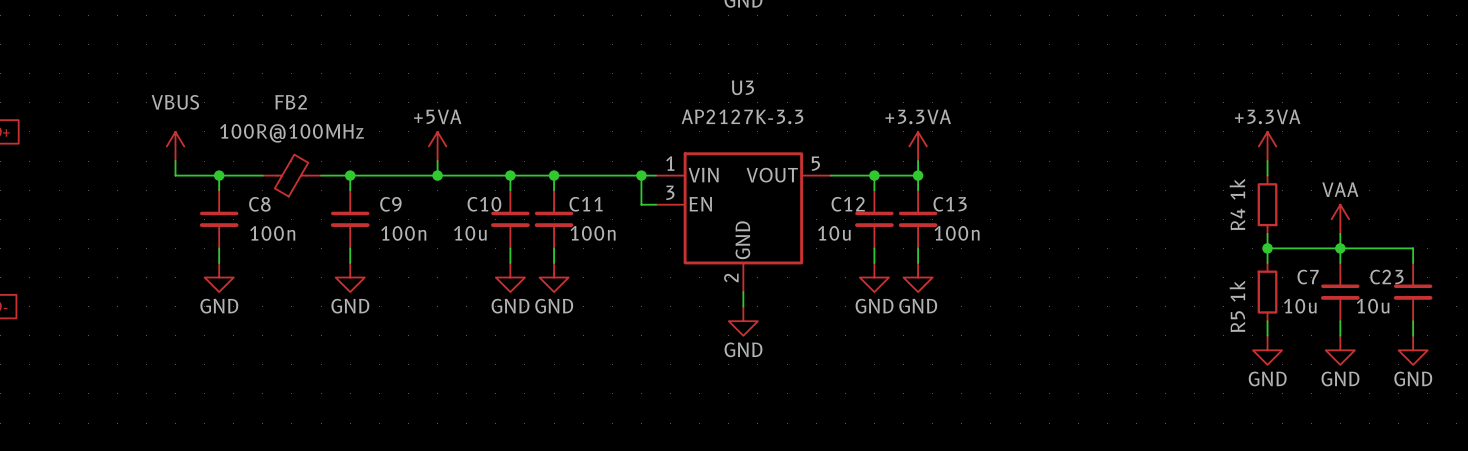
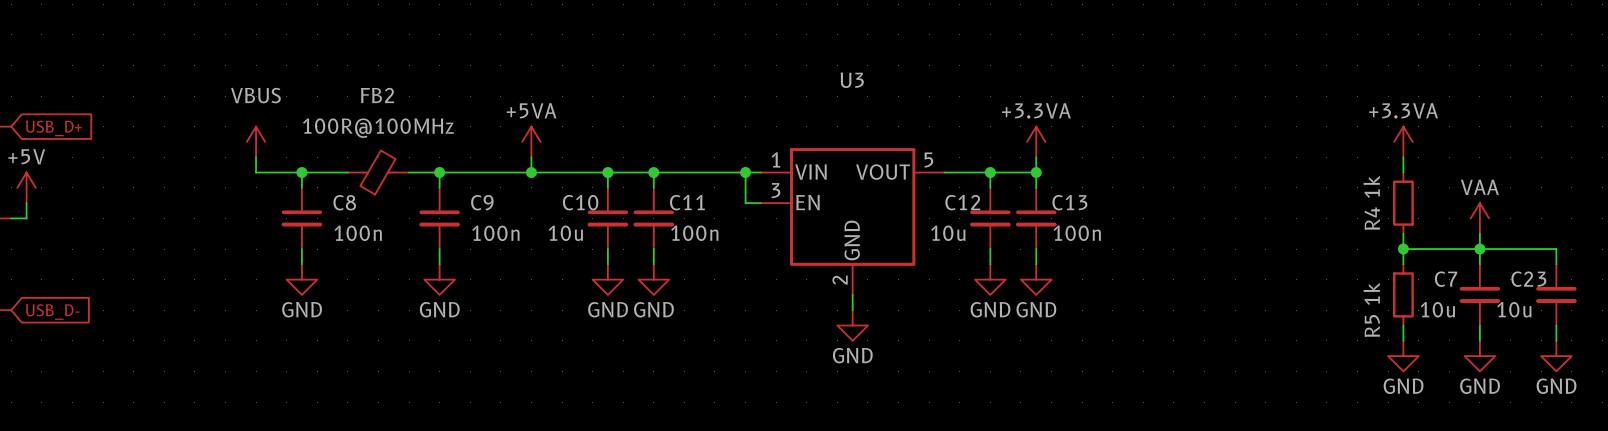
U3 value: AP2127K-3.3 (742, 116) -> none

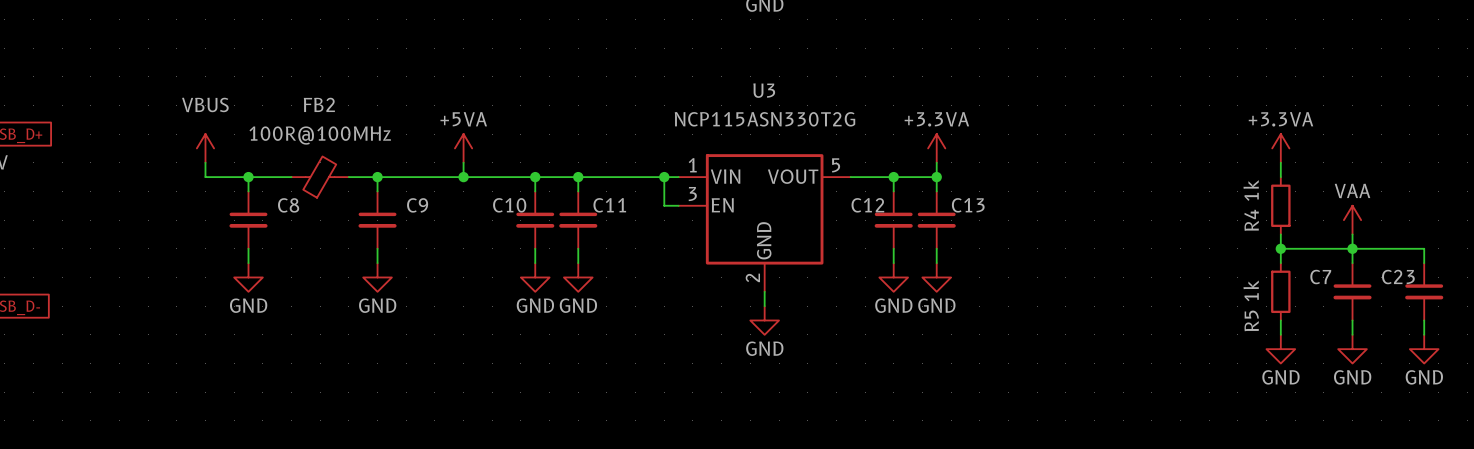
U3 value: none -> NCP115ASN330T2G (764, 119)
C8 value: 100n (358, 233) -> none
C9 value: 100n (495, 233) -> none
C10 value: 10u (565, 233) -> none
C11 value: 100n (694, 233) -> none
C12 value: 10u (948, 233) -> none
C13 value: 100n (1077, 233) -> none
C7 value: 10u (1437, 309) -> none
C23 value: 10u (1514, 309) -> none

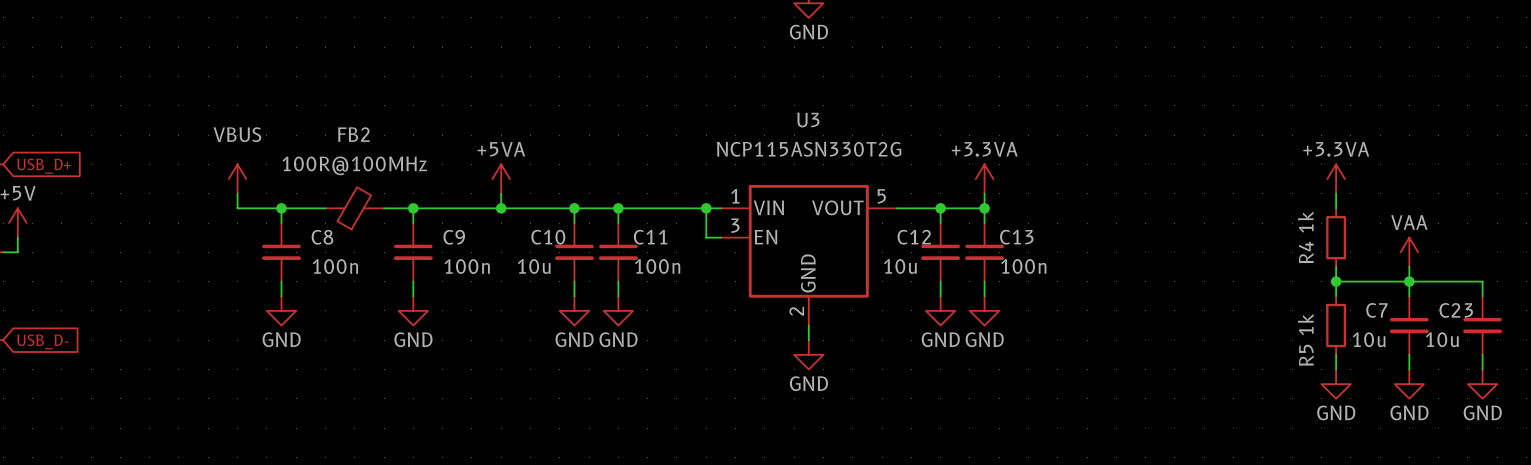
C10 value: none -> 10u (534, 266)
C11 value: none -> 100n (657, 266)
C12 value: none -> 10u (900, 266)
C13 value: none -> 100n (1023, 266)
C8 value: none -> 100n (335, 266)
C9 value: none -> 100n (467, 266)
C7 value: none -> 10u (1369, 339)
C23 value: none -> 10u (1442, 339)

